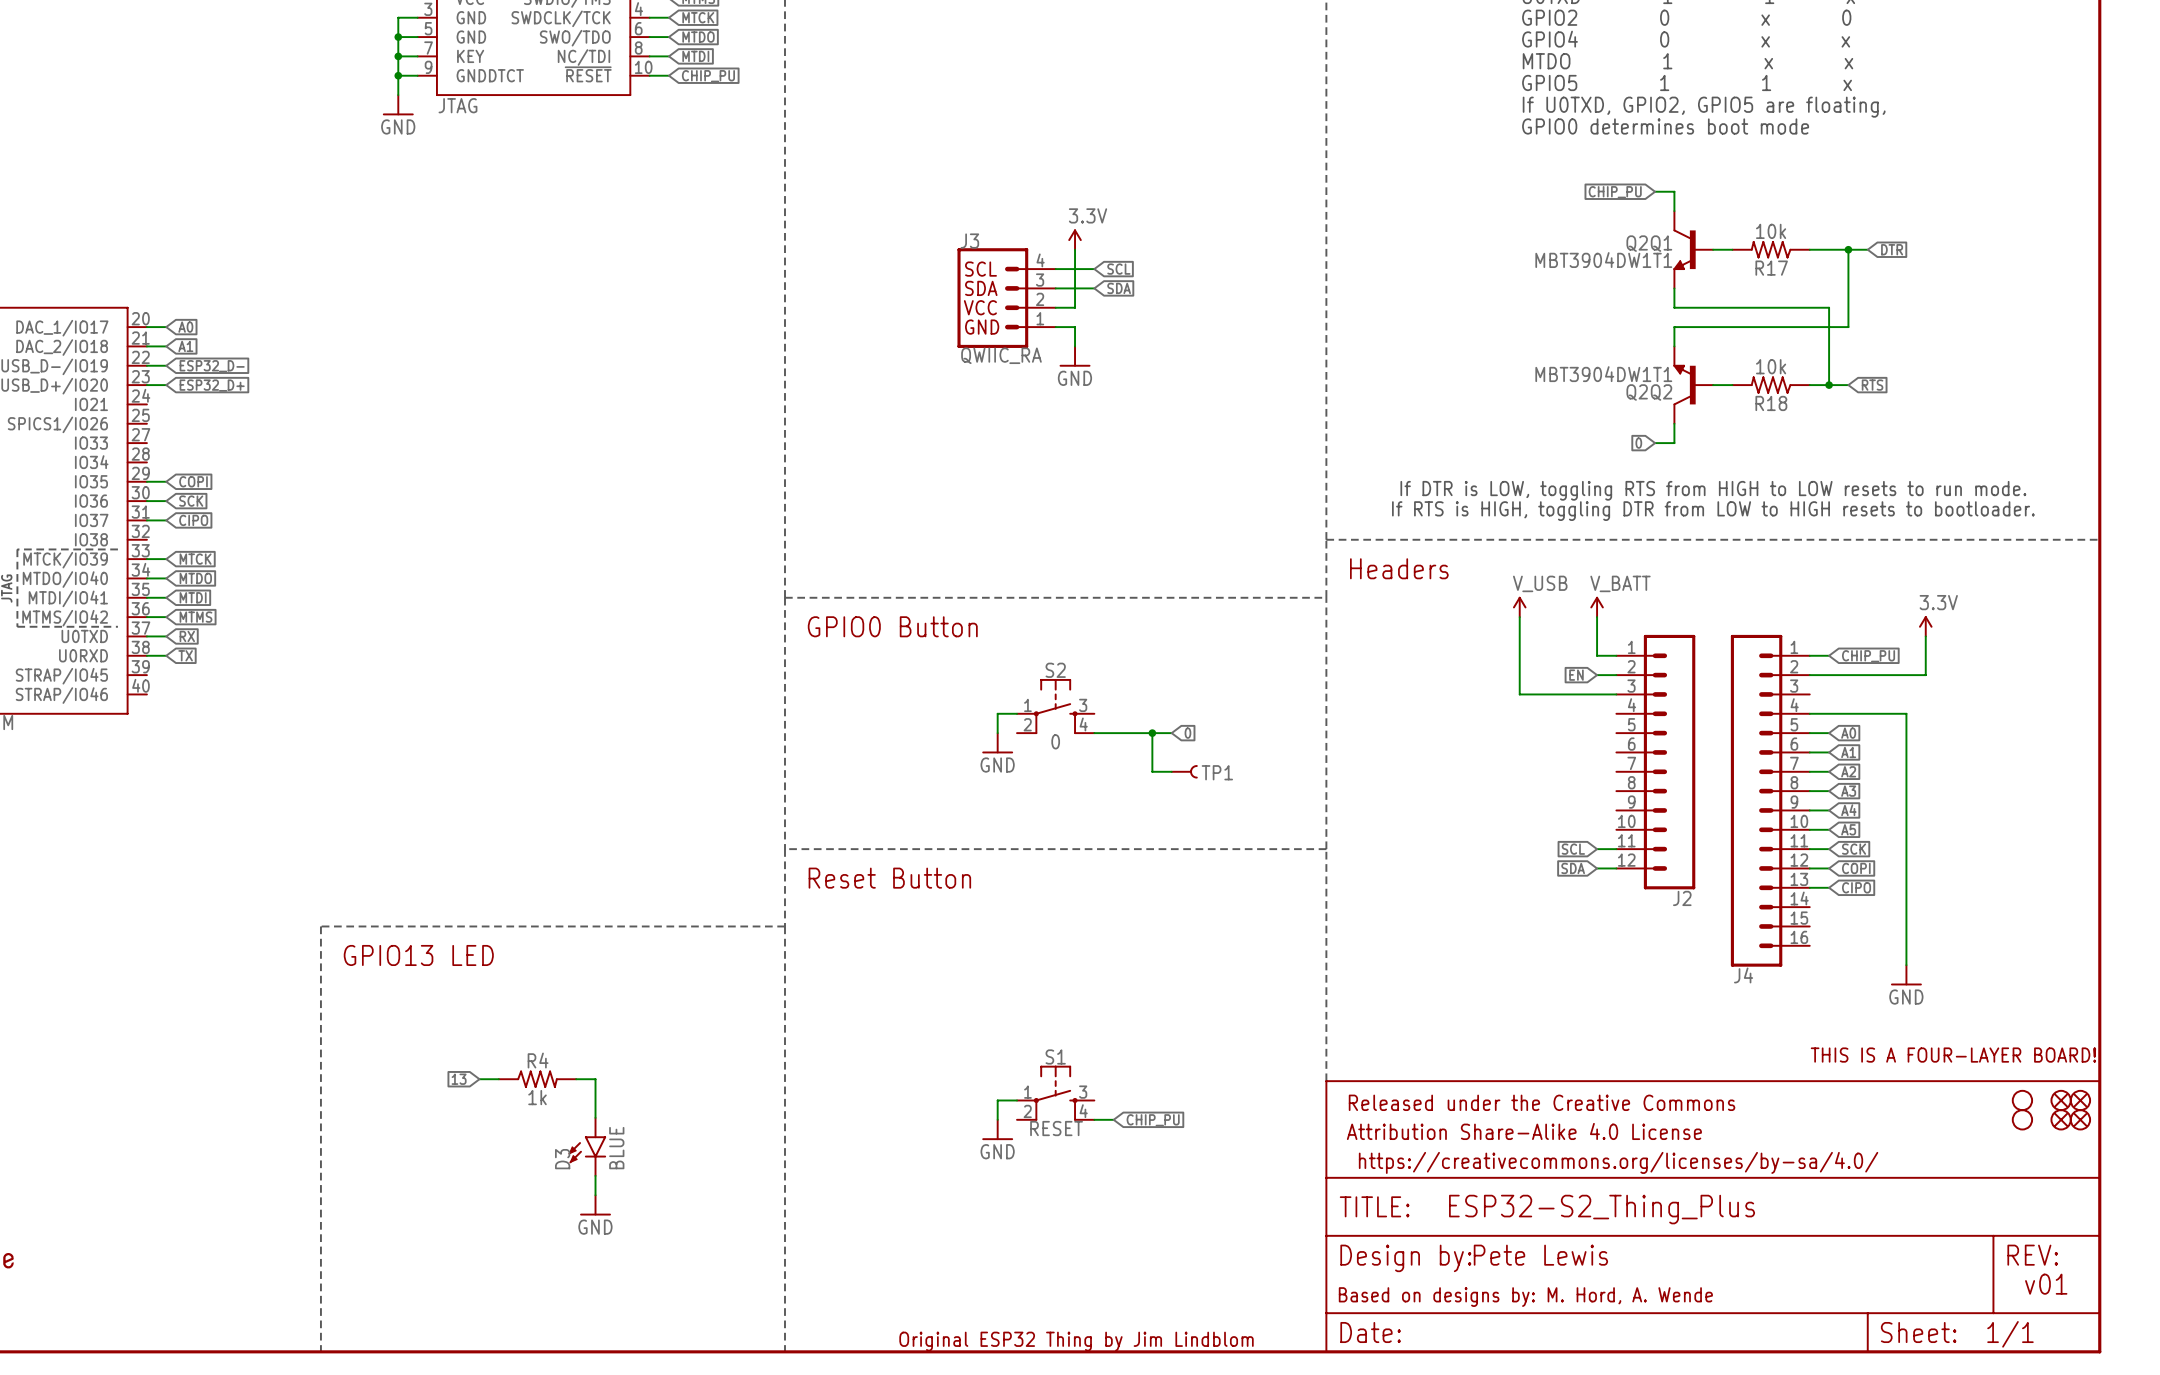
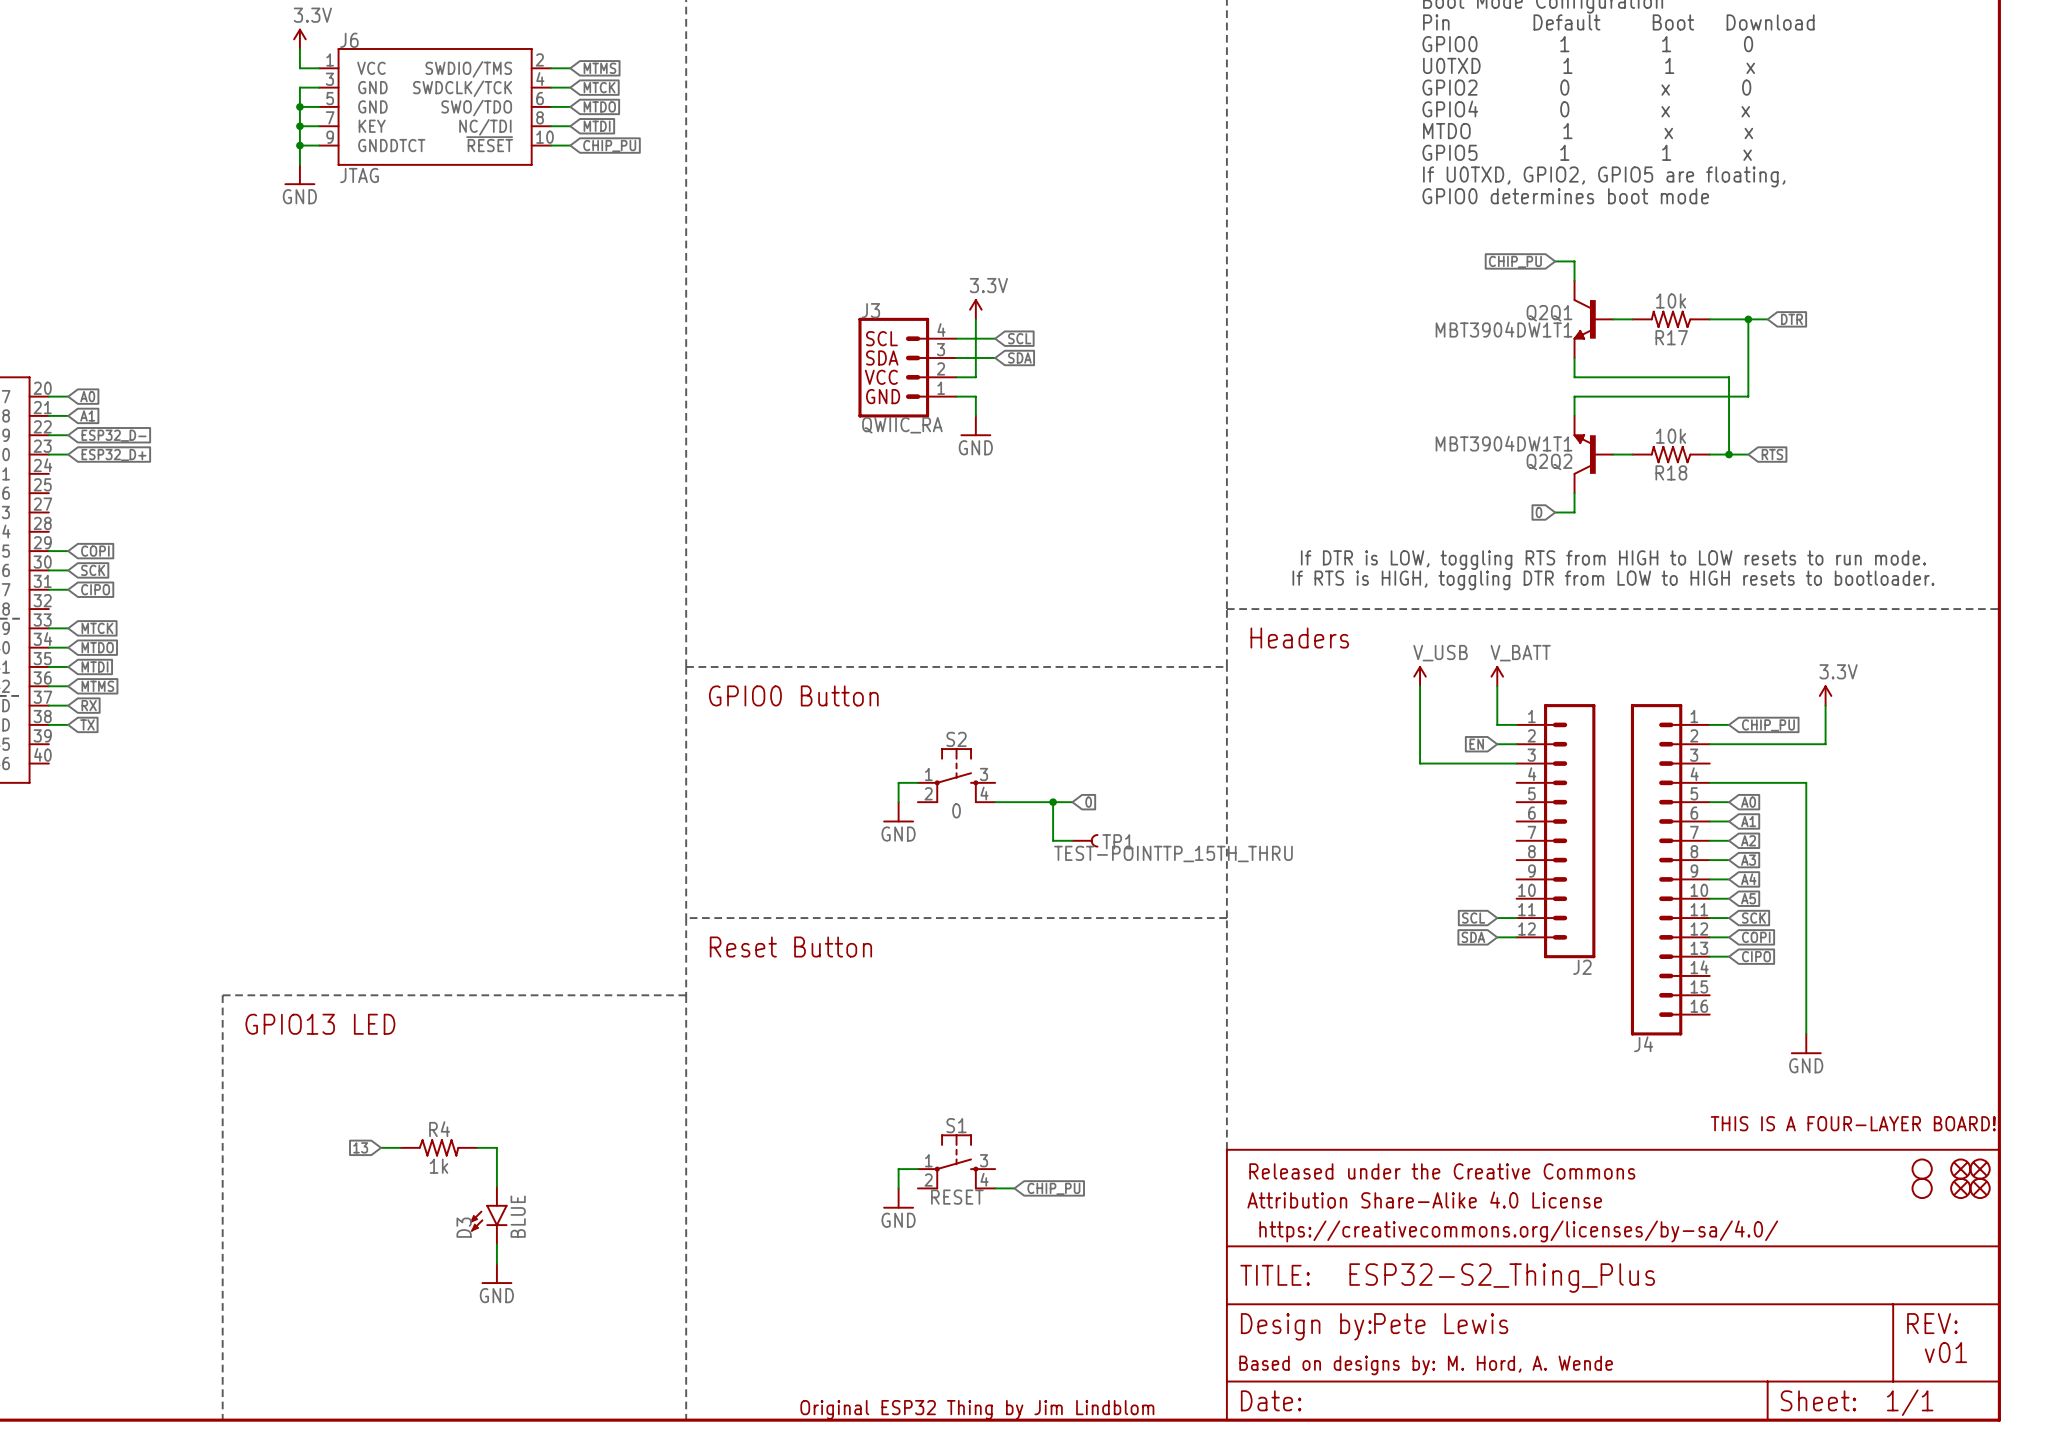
TP1 value: none -> TEST-POINTTP_15TH_THRU (1173, 853)

